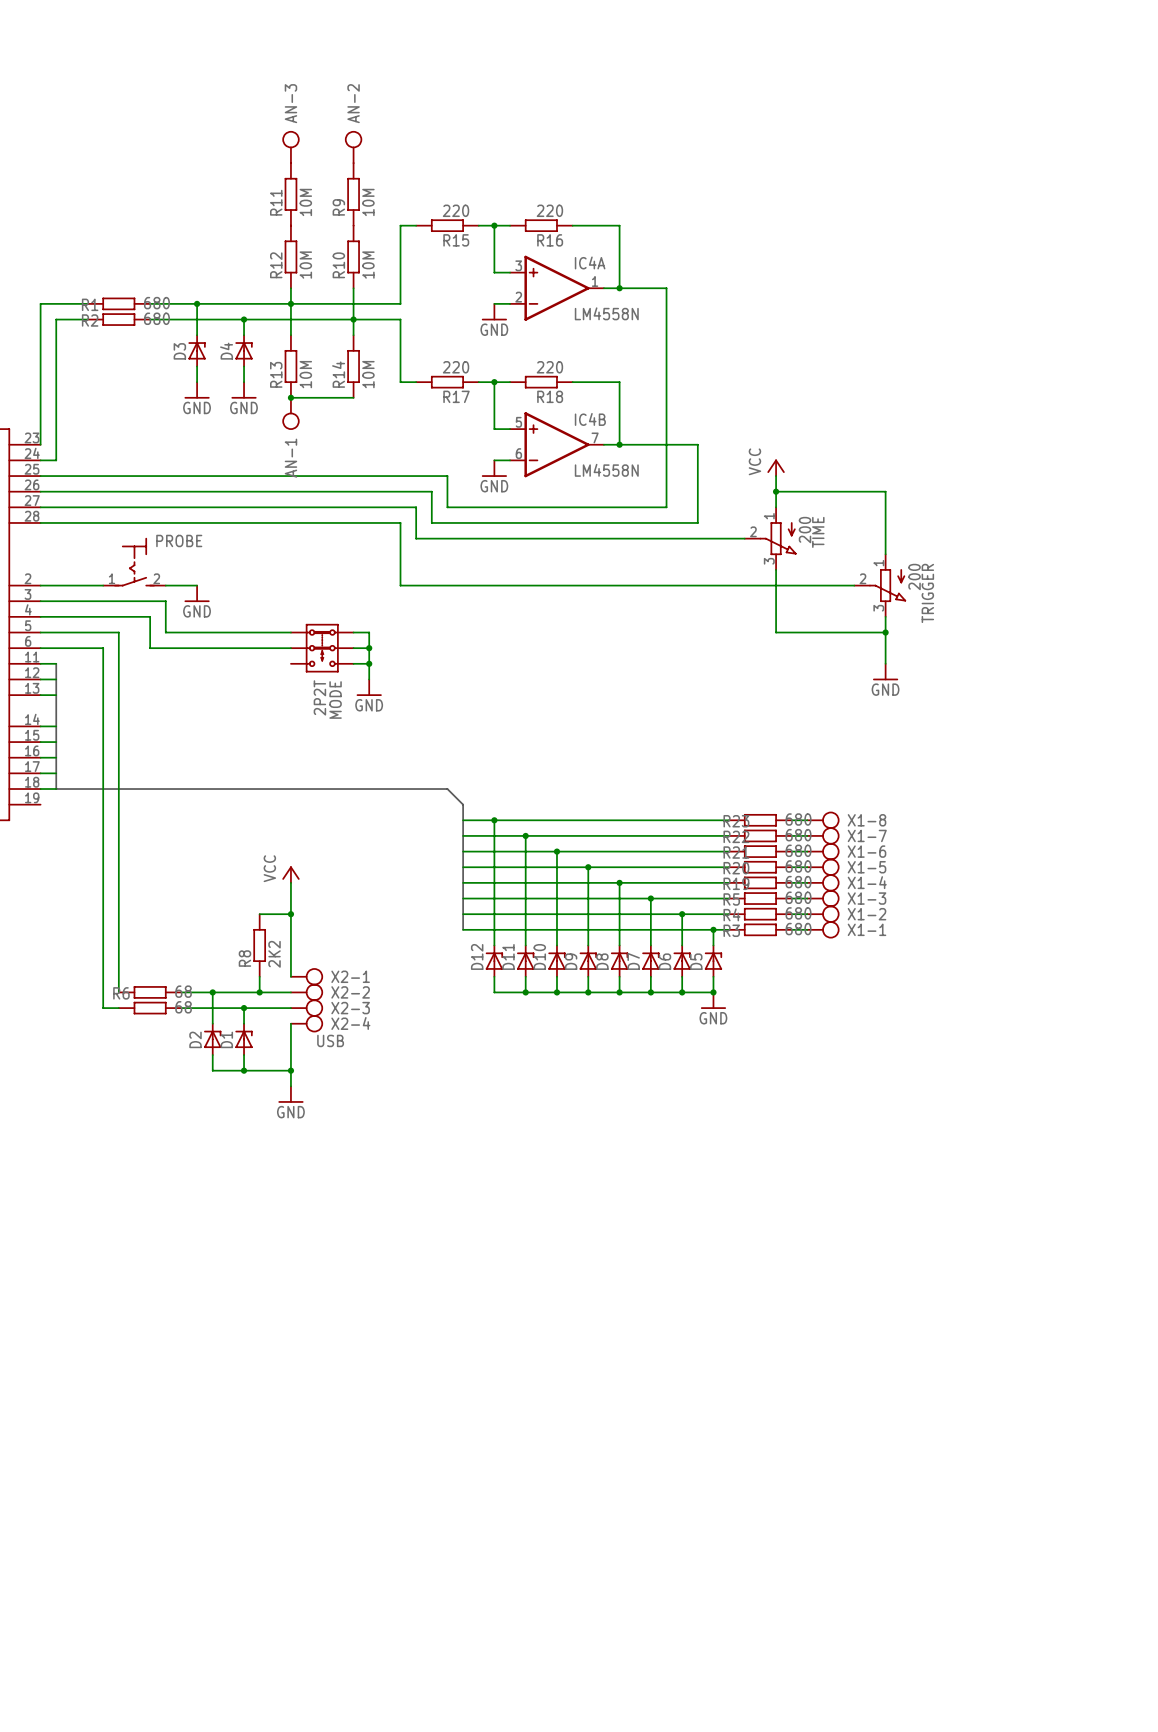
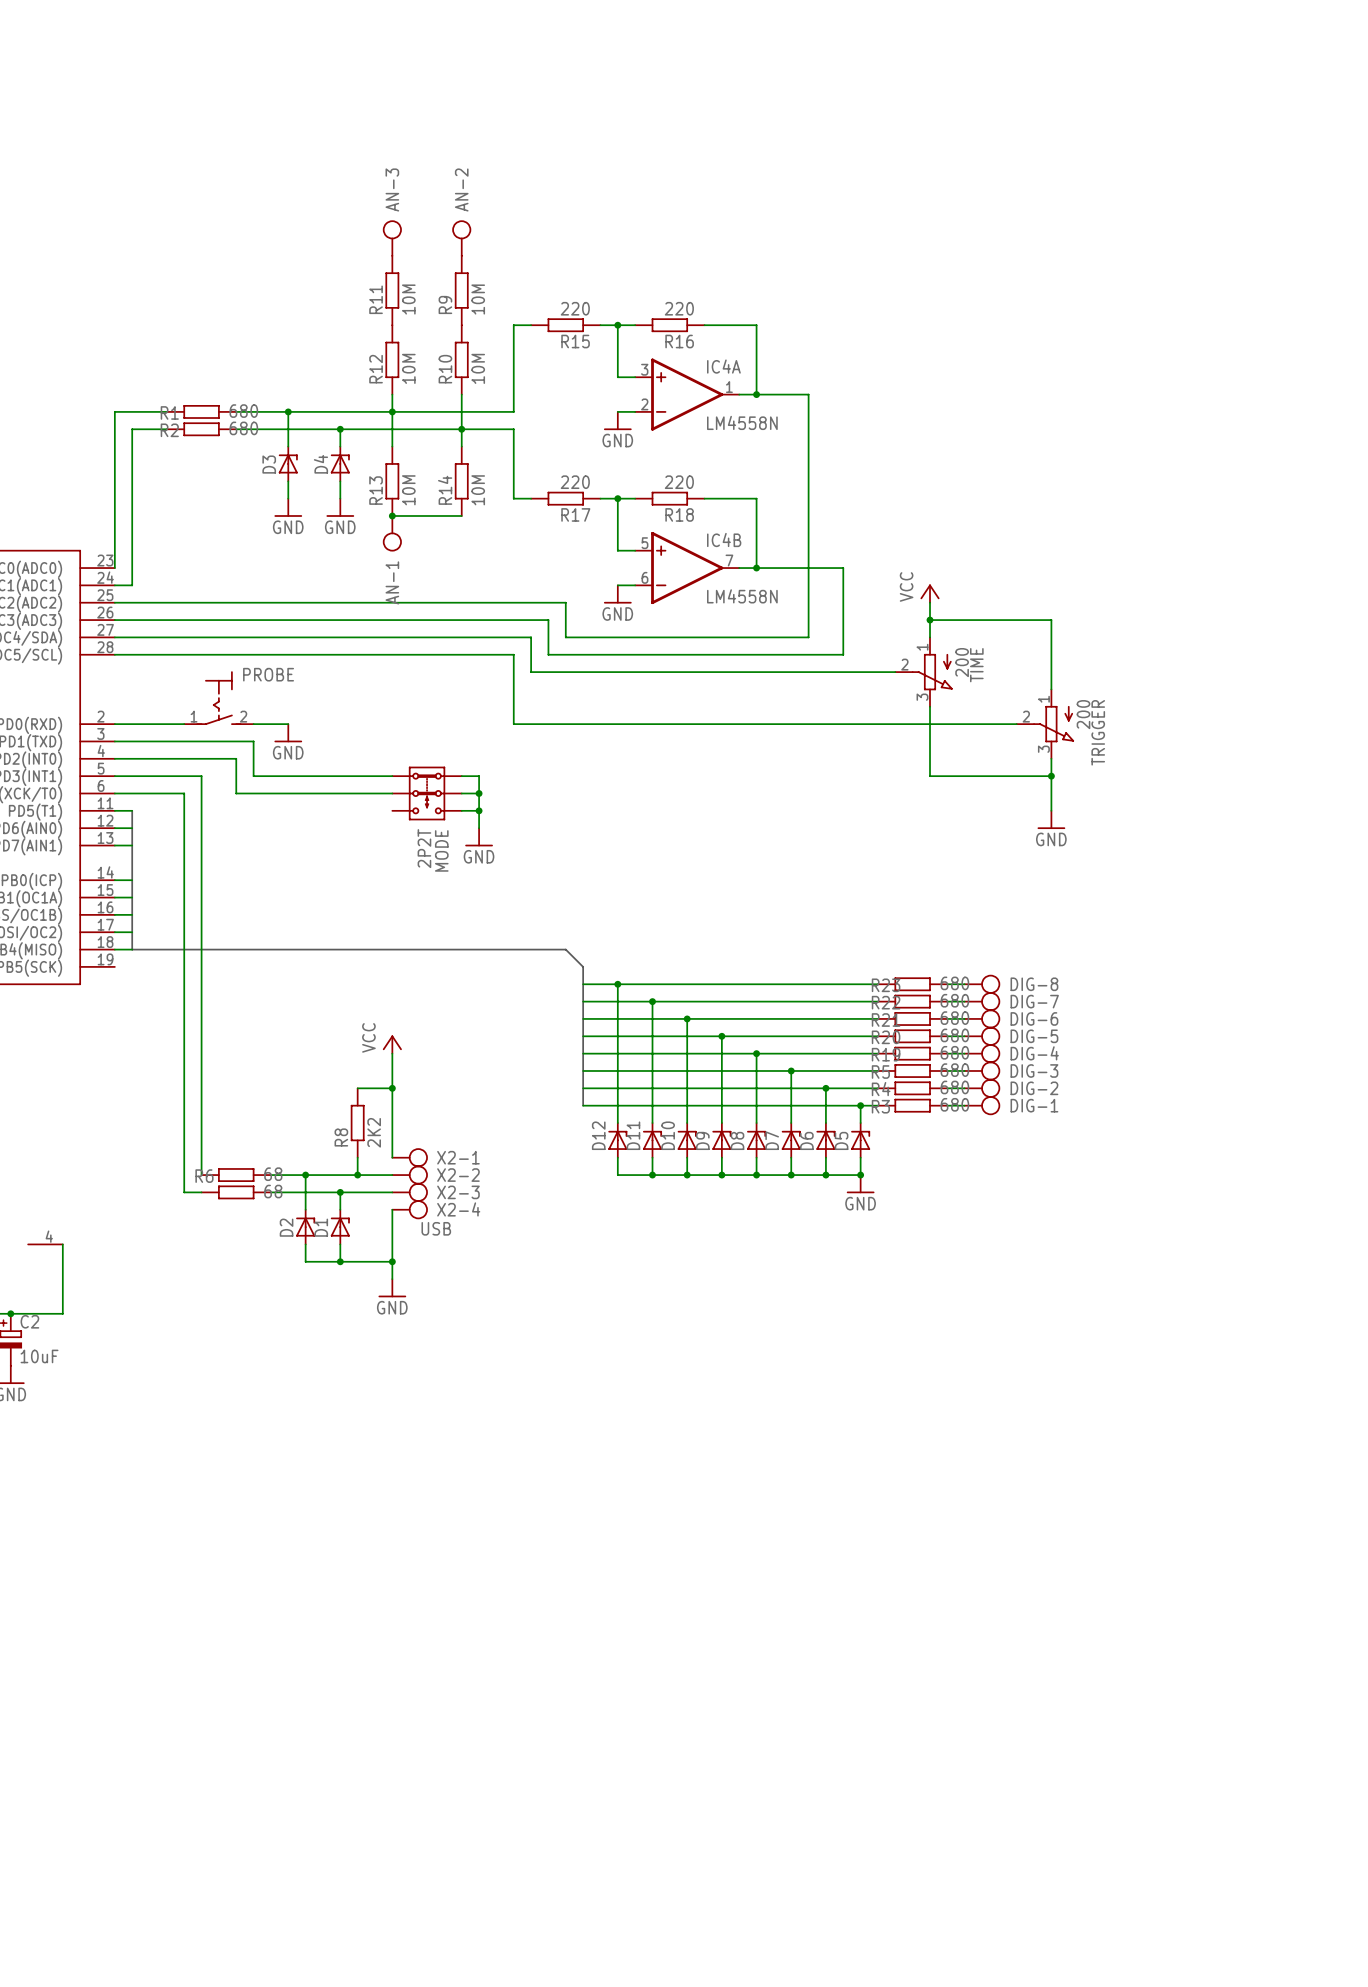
X1-8 name: X1-8 (867, 820) -> DIG-8 (1034, 984)
X1-7 name: X1-7 (867, 835) -> DIG-7 (1034, 1001)
X1-6 name: X1-6 (867, 851) -> DIG-6 (1034, 1018)
X1-5 name: X1-5 (867, 867) -> DIG-5 (1034, 1036)
X1-4 name: X1-4 (867, 882) -> DIG-4 (1034, 1053)
X1-3 name: X1-3 (867, 898) -> DIG-3 (1034, 1070)
X1-2 name: X1-2 (867, 914) -> DIG-2 (1034, 1088)
X1-1 name: X1-1 (867, 929) -> DIG-1 (1034, 1105)

